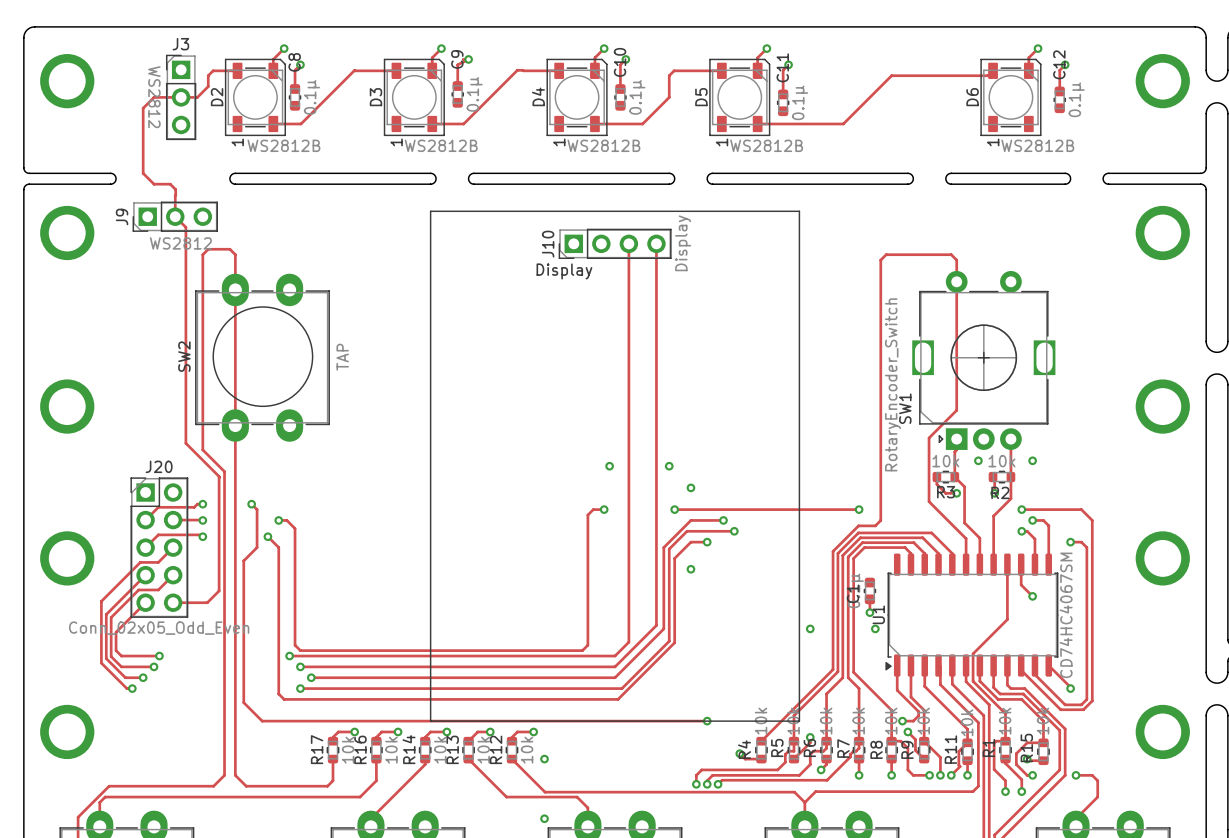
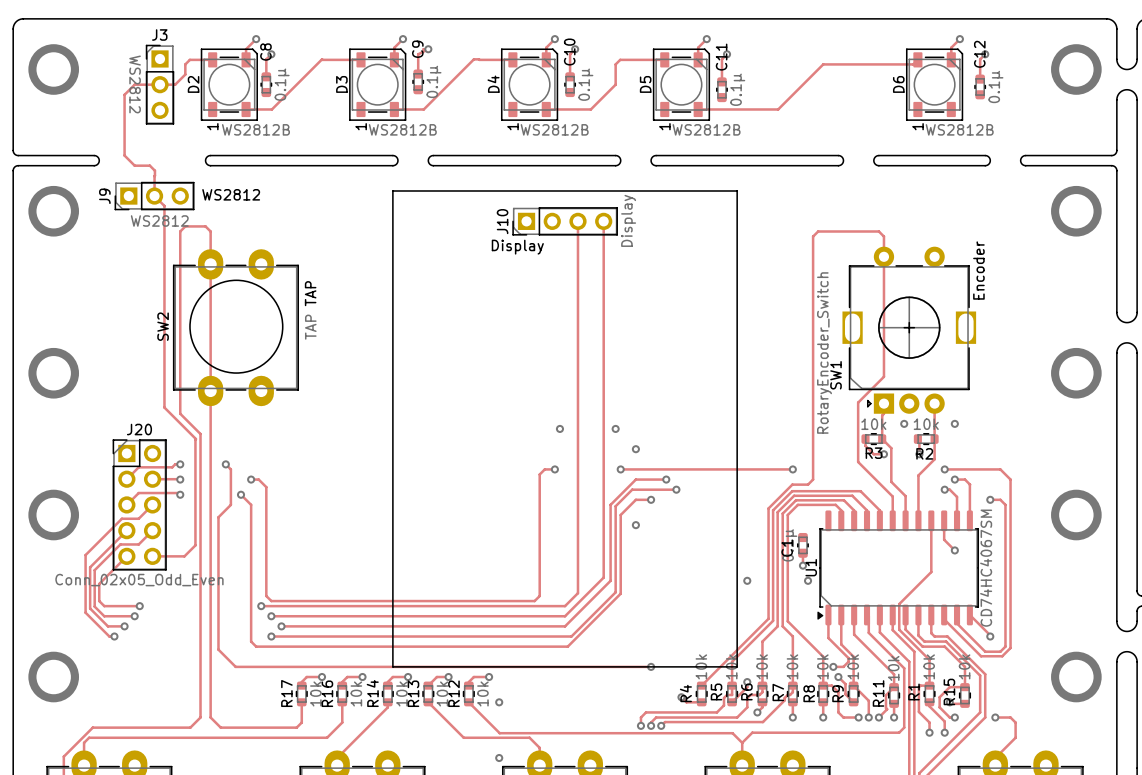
text: none -> WS2812 (231, 194)
text: none -> Encoder (978, 270)
text: none -> TAP (310, 293)

